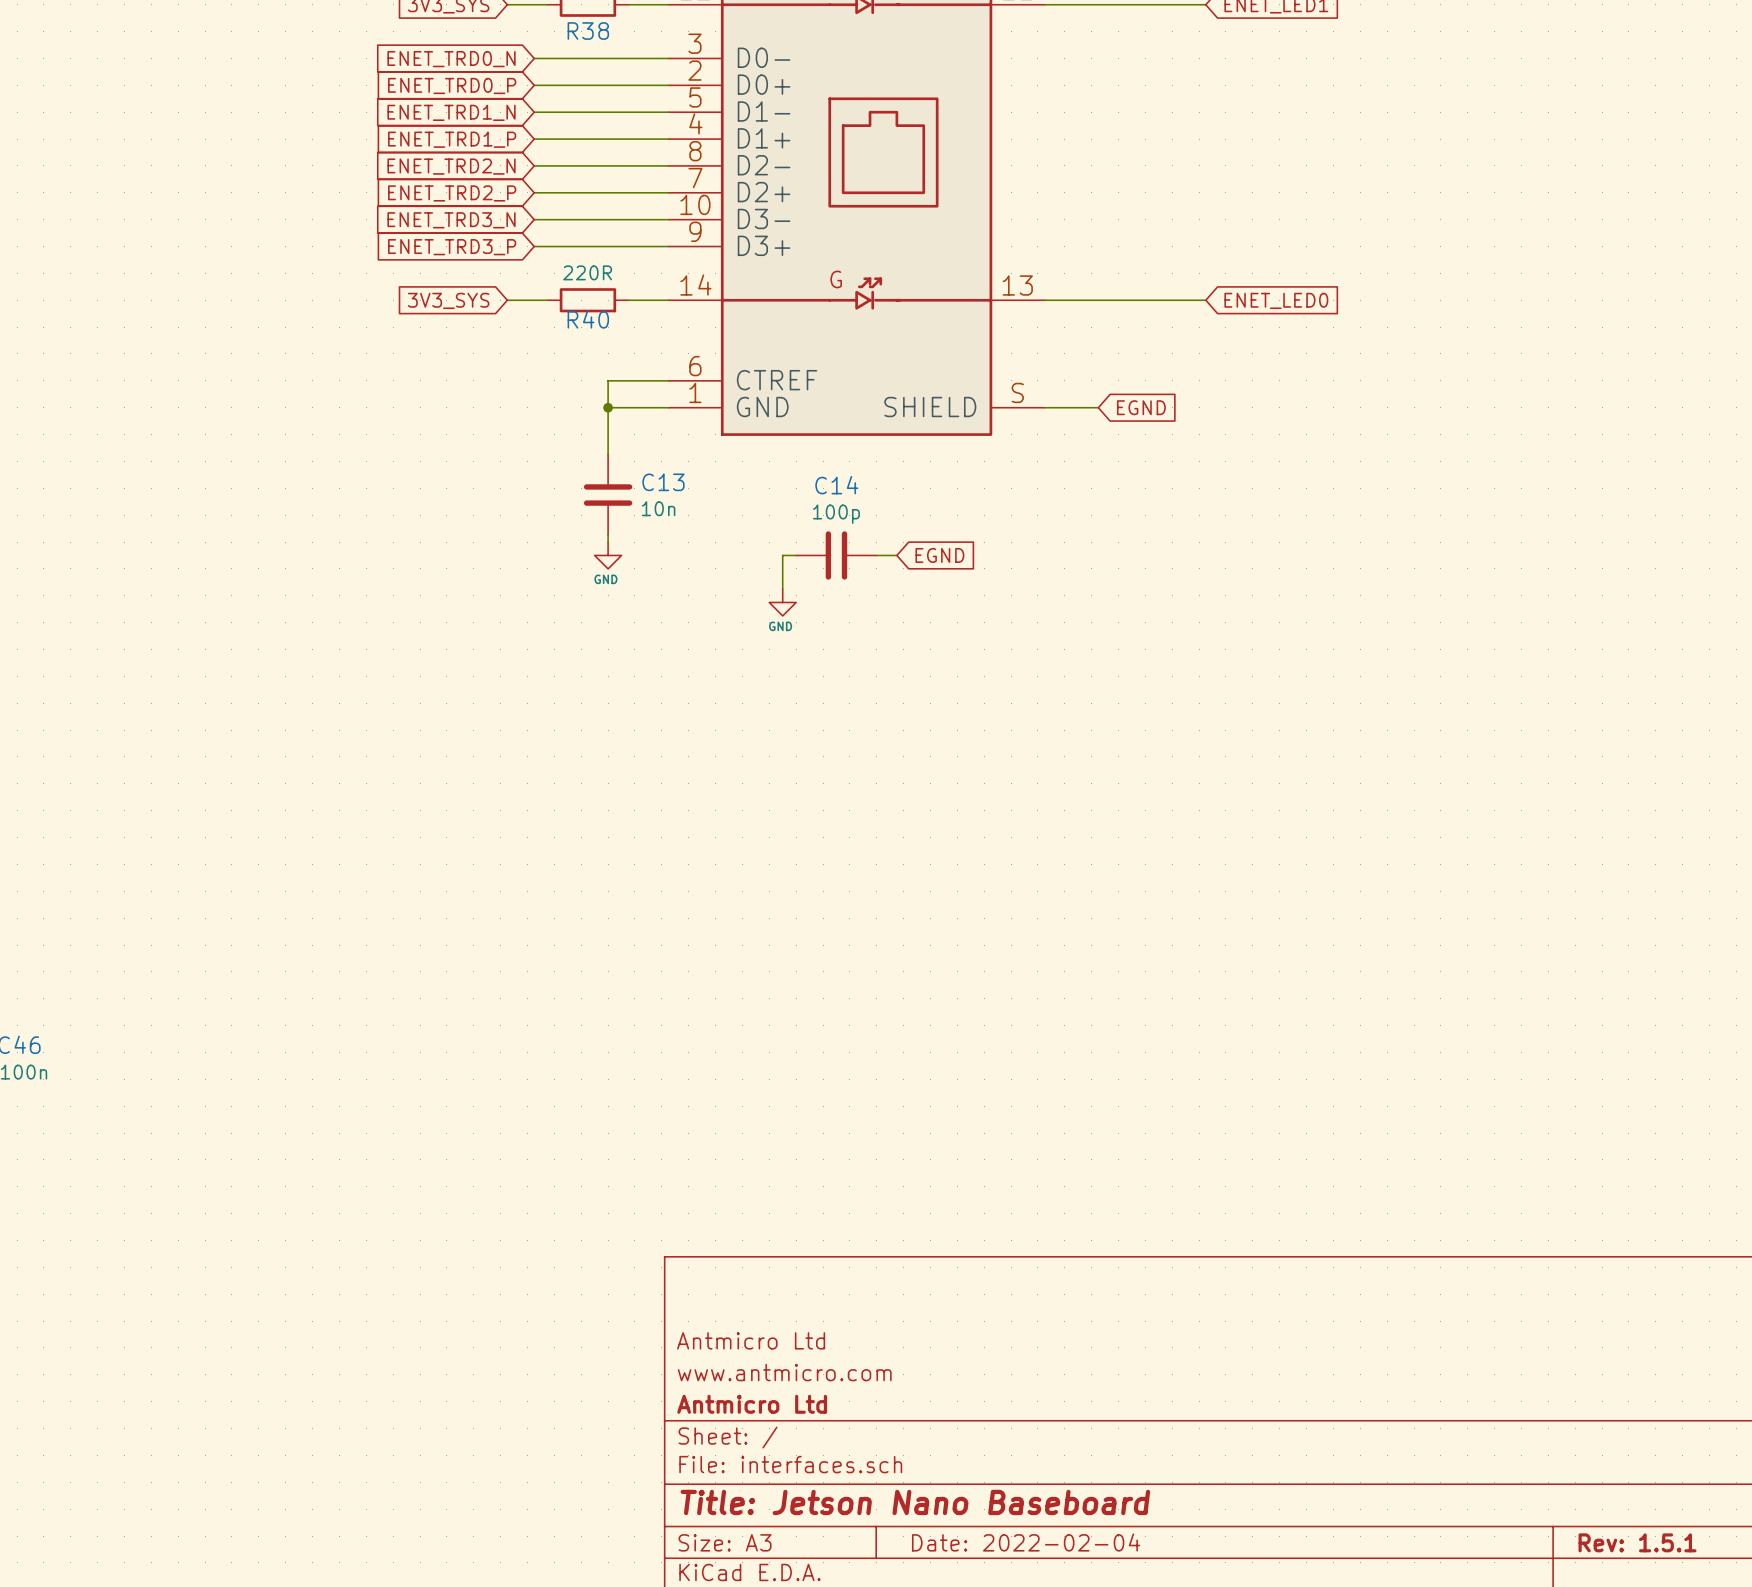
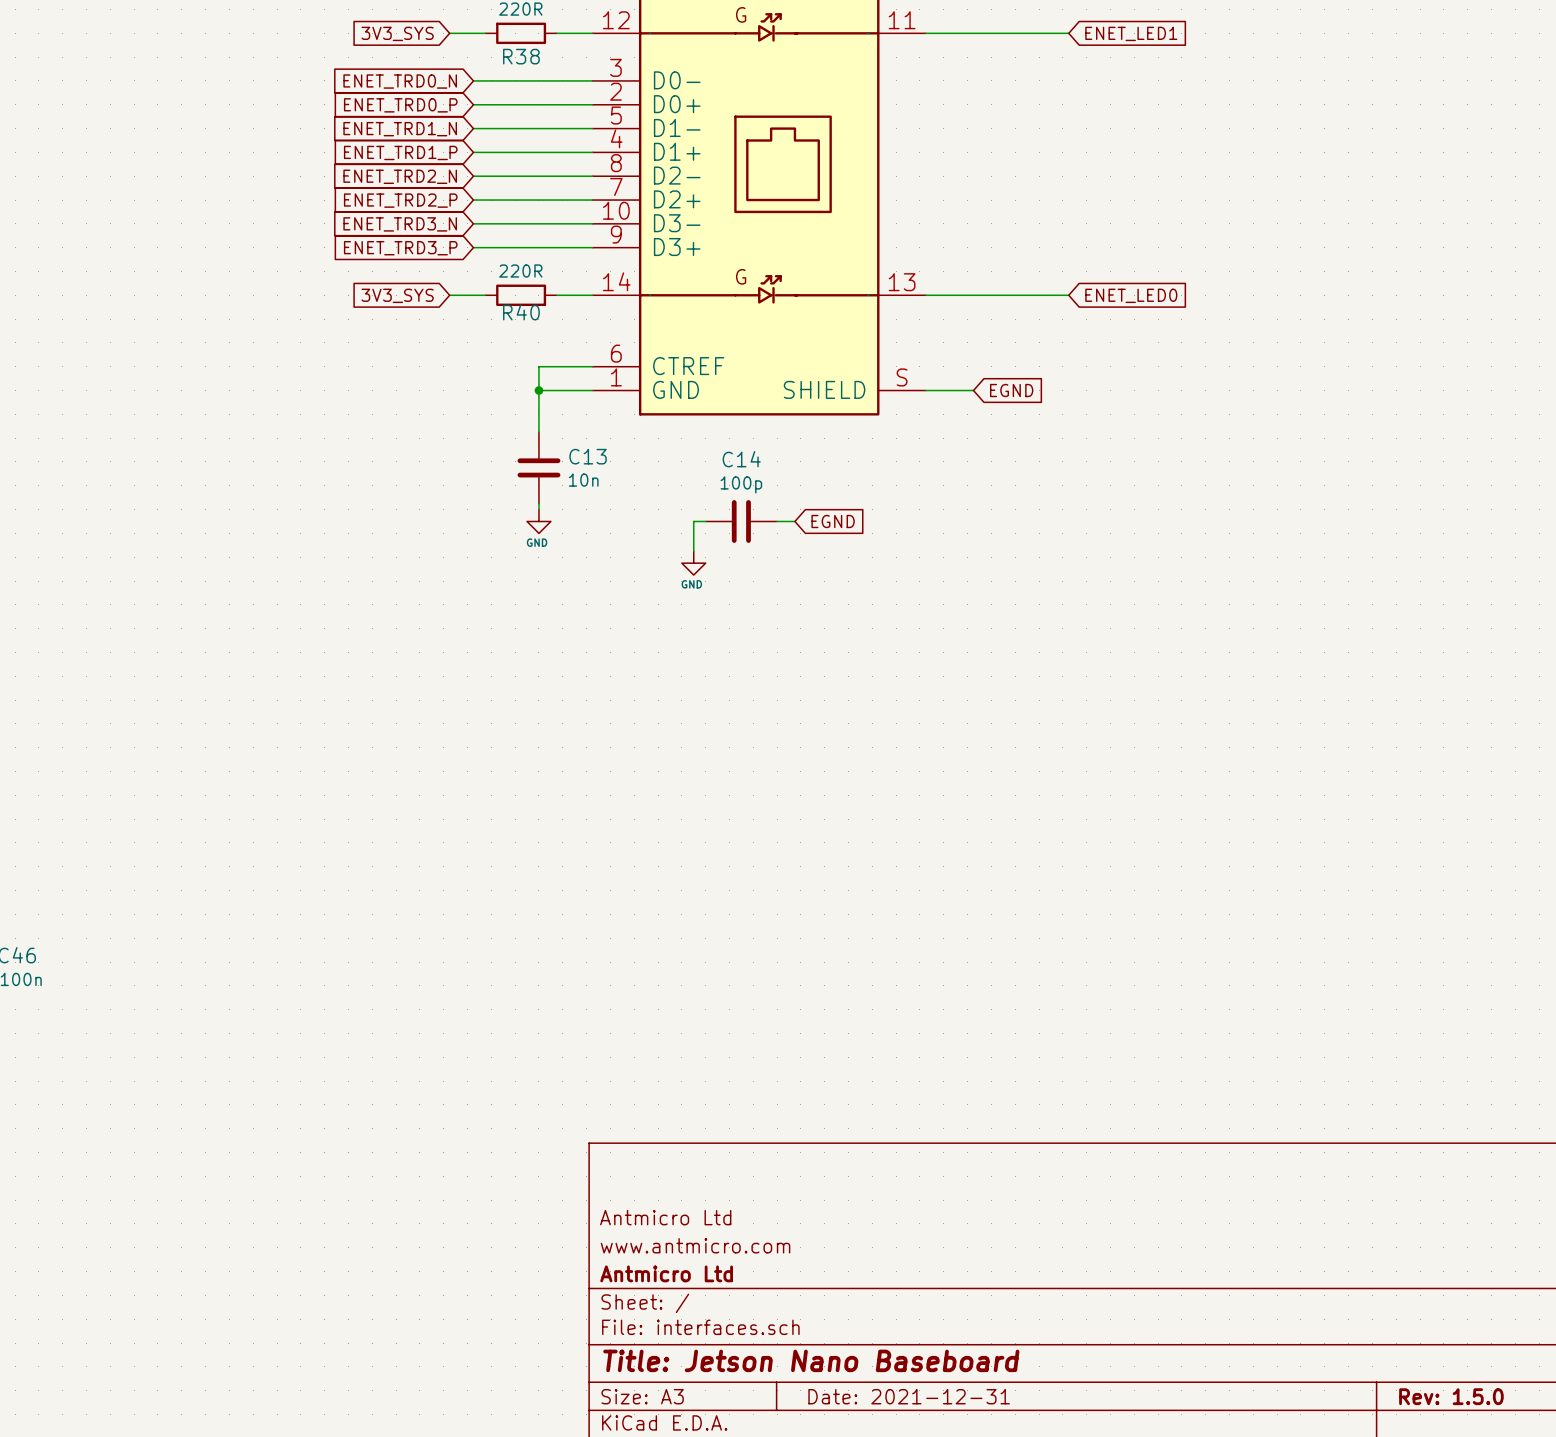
title block: Date: 2022-02-04 (1026, 1542) -> Date: 2021-12-31 (909, 1396)
title block: Rev: 1.5.1 (1637, 1542) -> Rev: 1.5.0 (1451, 1396)

